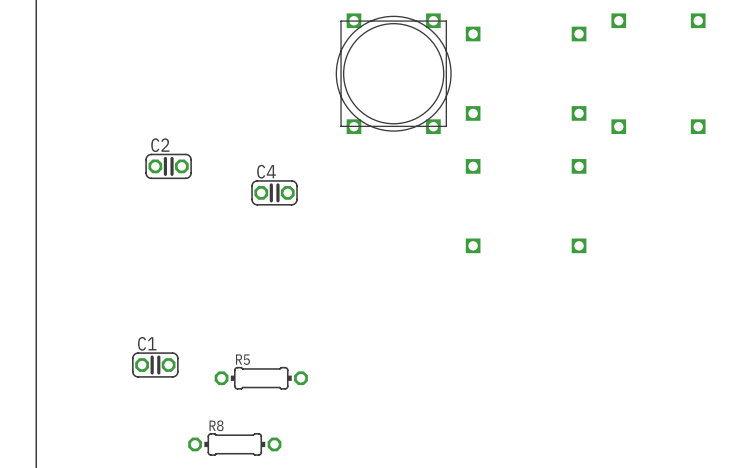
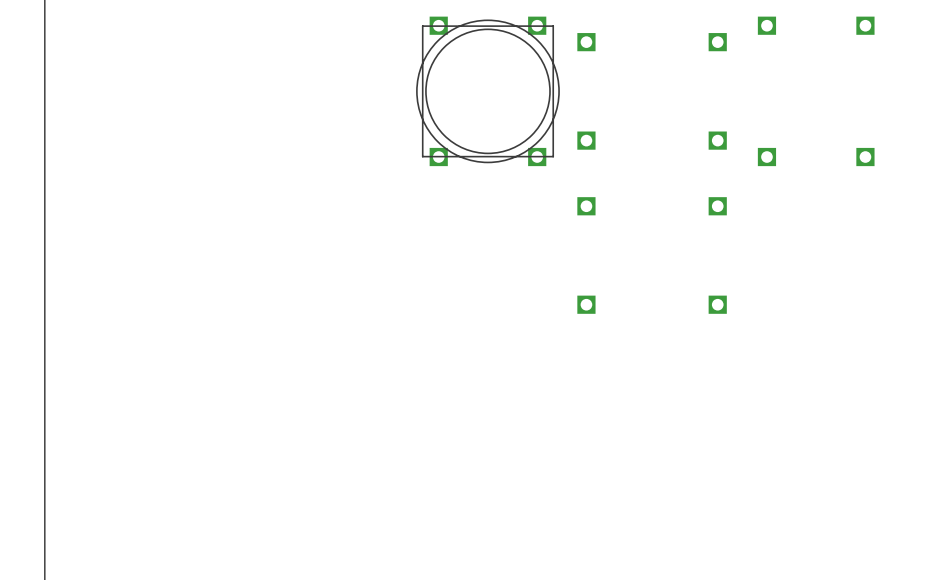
C2: (168, 166) -> none
C4: (274, 192) -> none
C1: (155, 365) -> none
R5: (261, 378) -> none
R8: (234, 444) -> none

